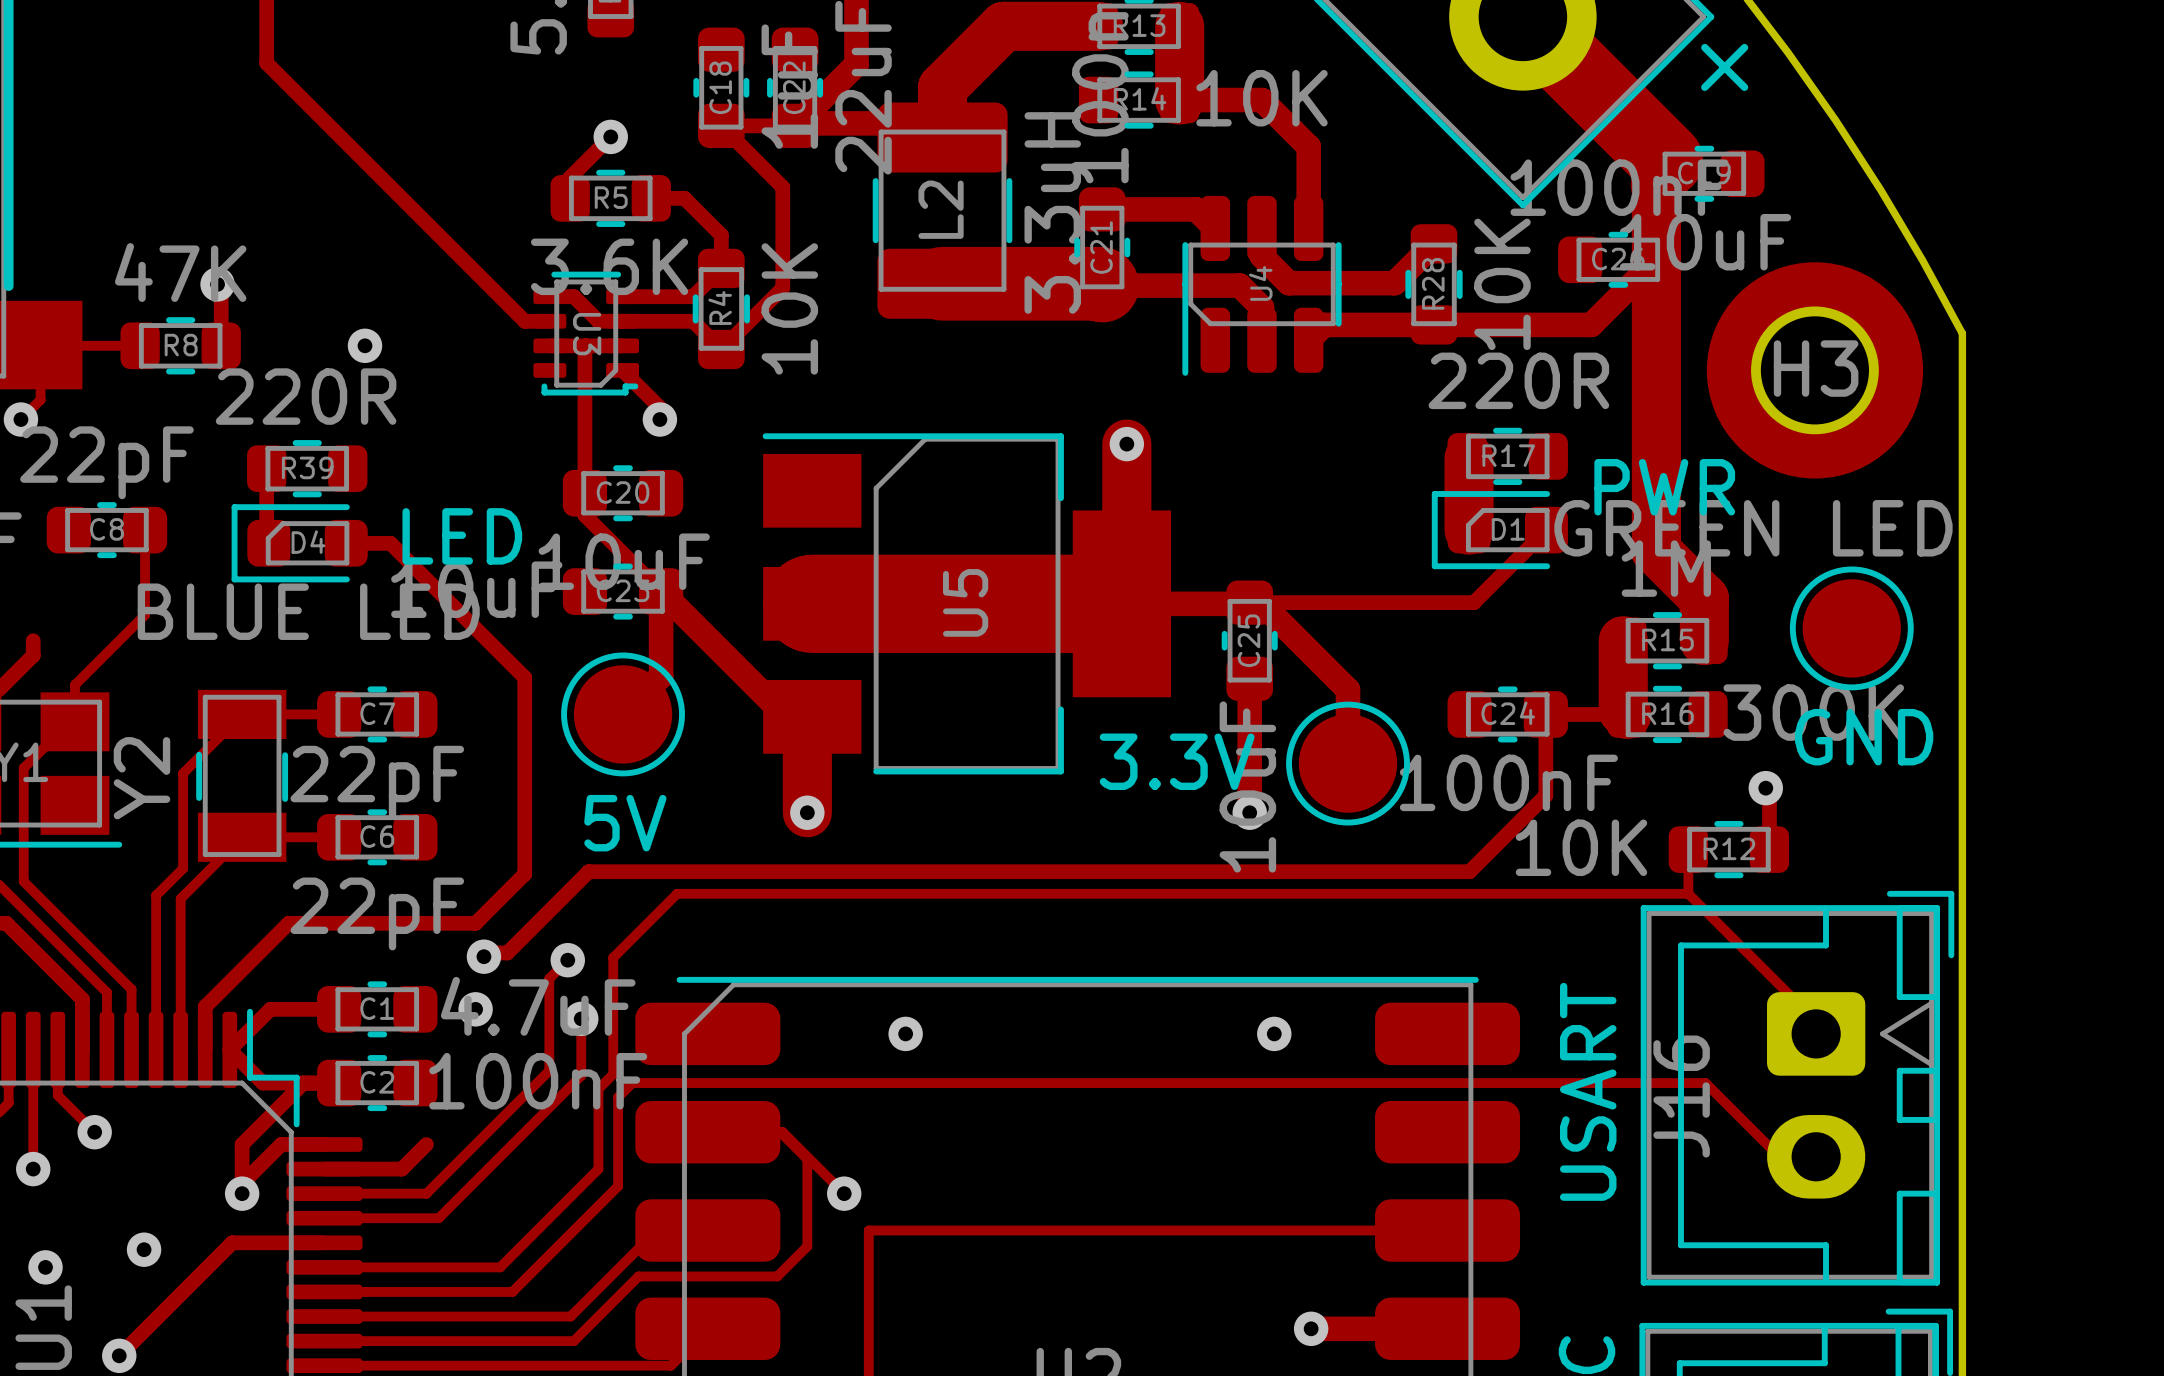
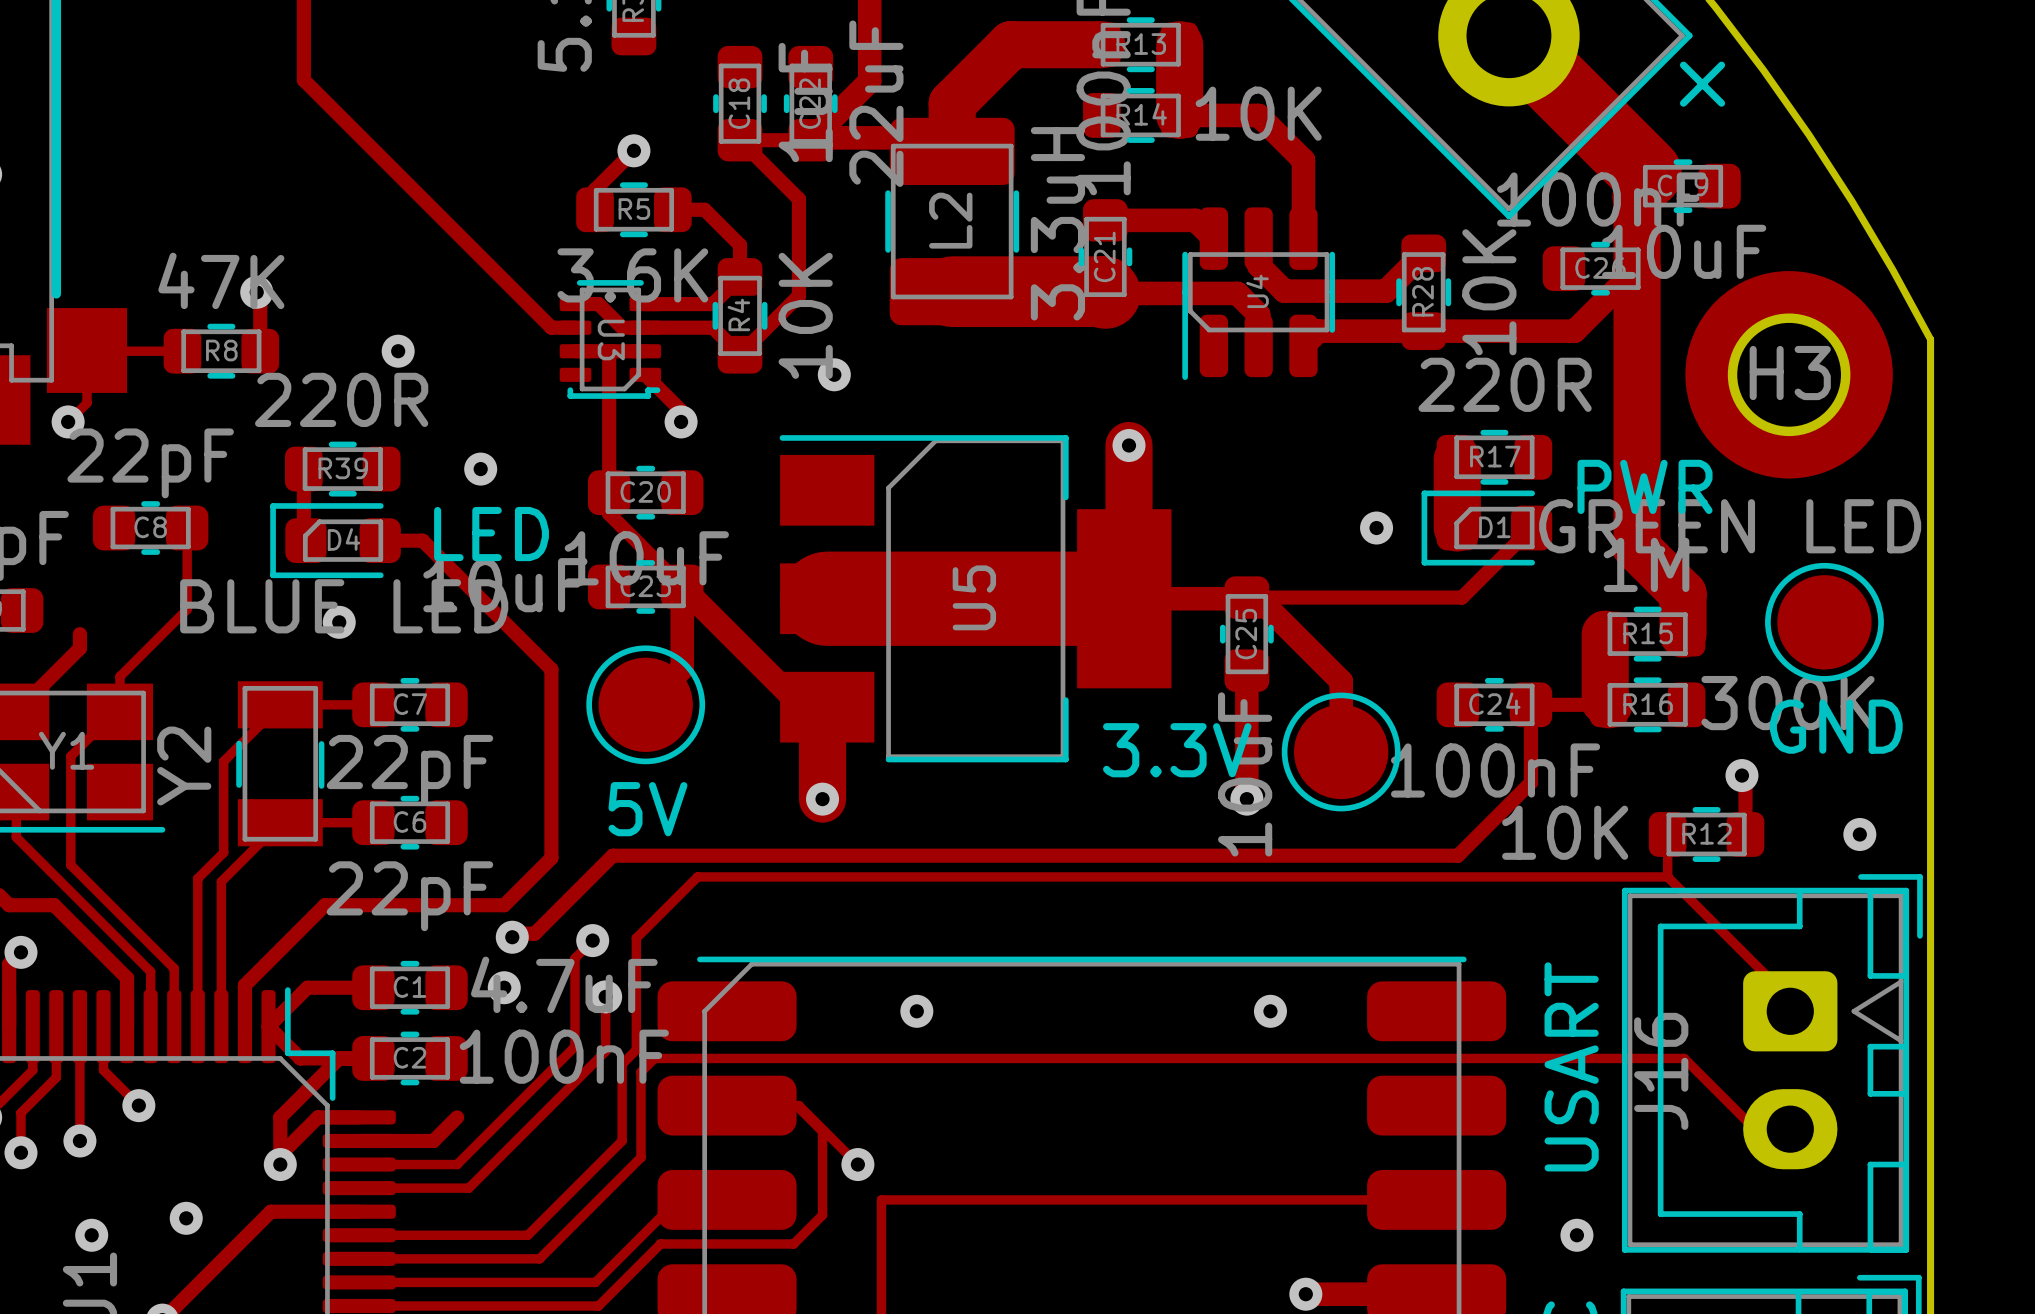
via: none -> (834, 374)
via: none -> (480, 469)
via: none -> (1376, 528)
via: none -> (339, 622)
via: none -> (1859, 834)
via: none -> (1576, 1235)

